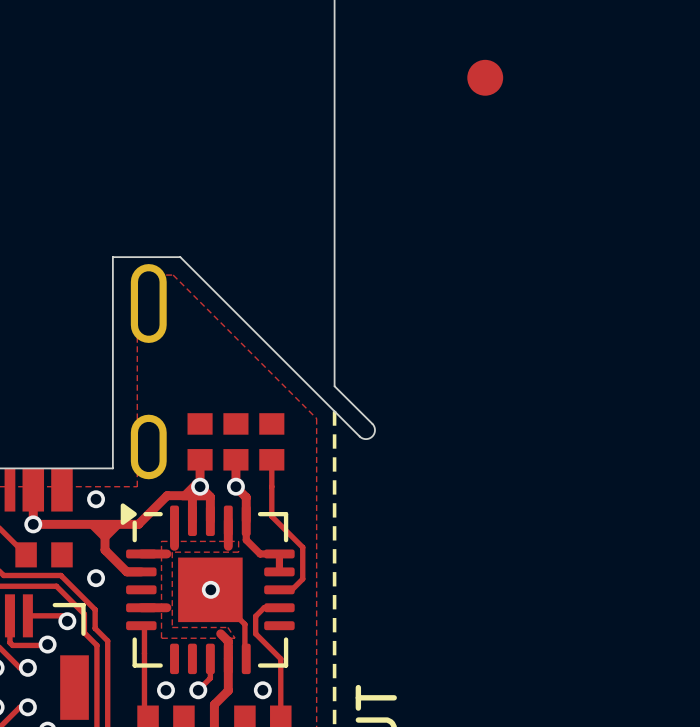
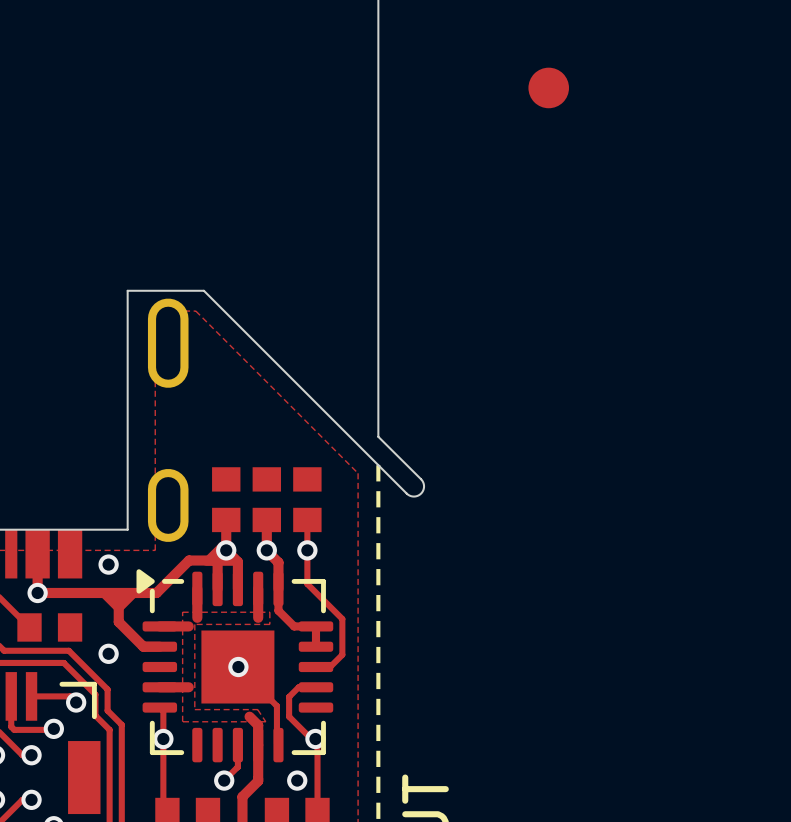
via: none -> (307, 550)
via: none -> (315, 739)
via position: (165, 690) -> (163, 739)

